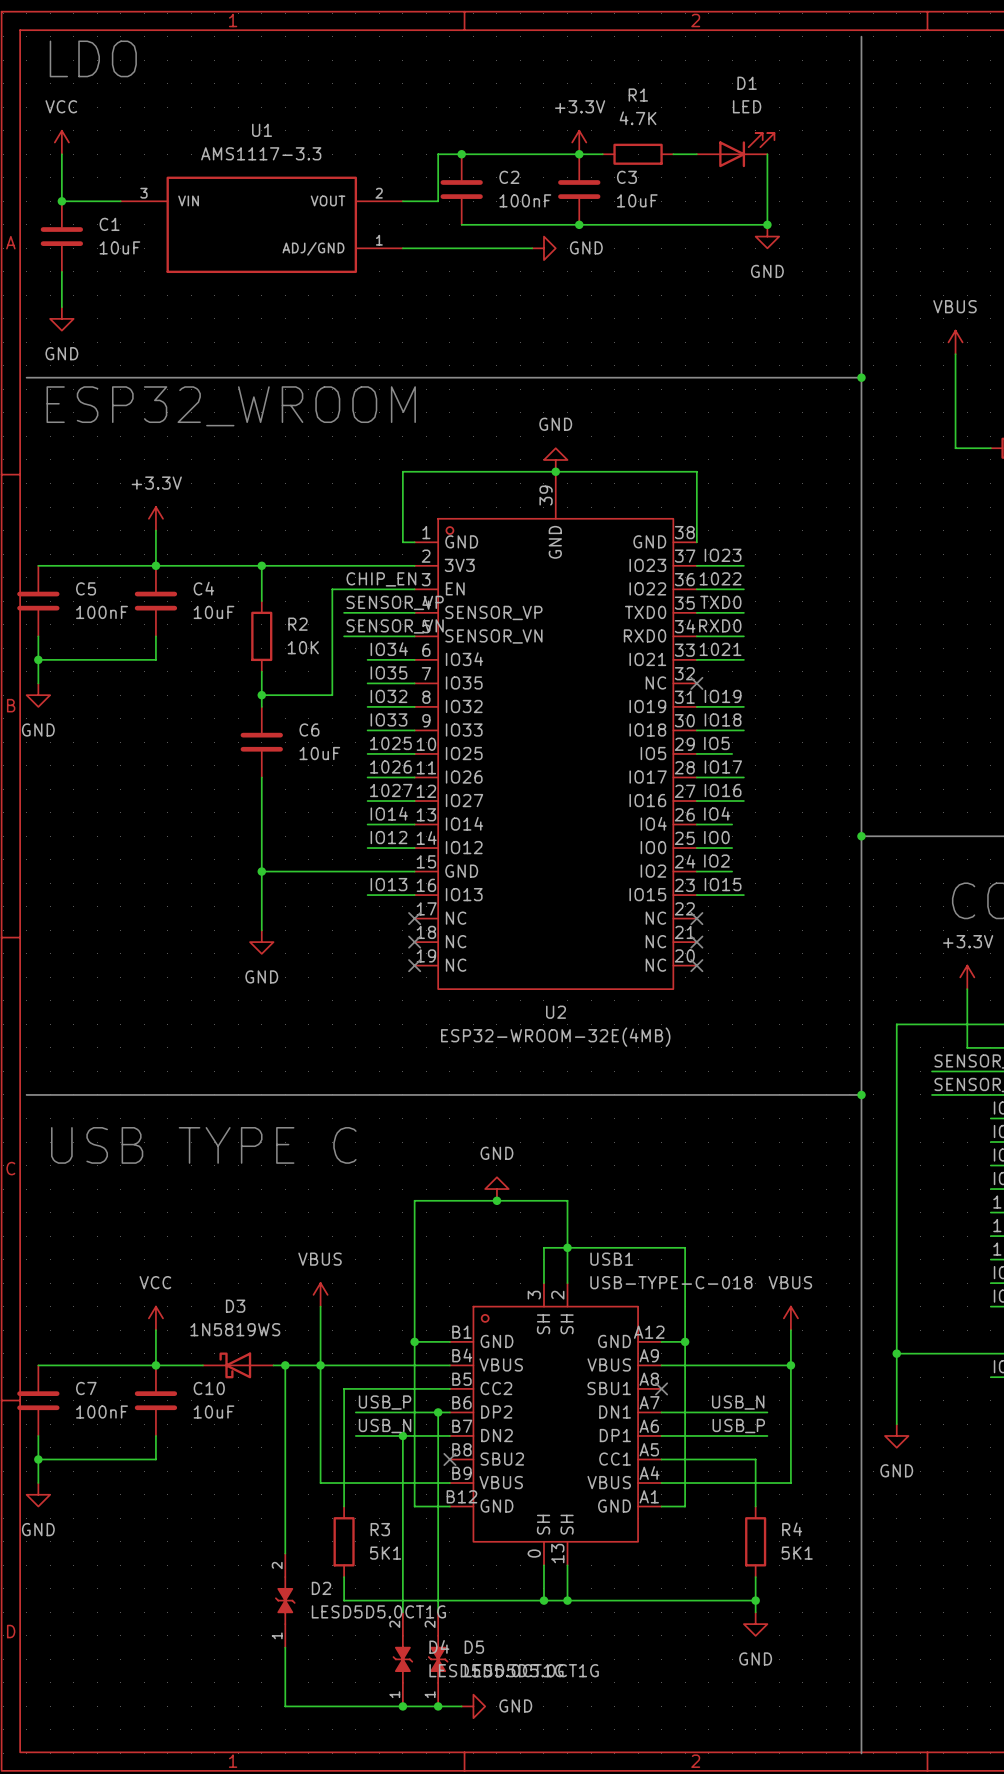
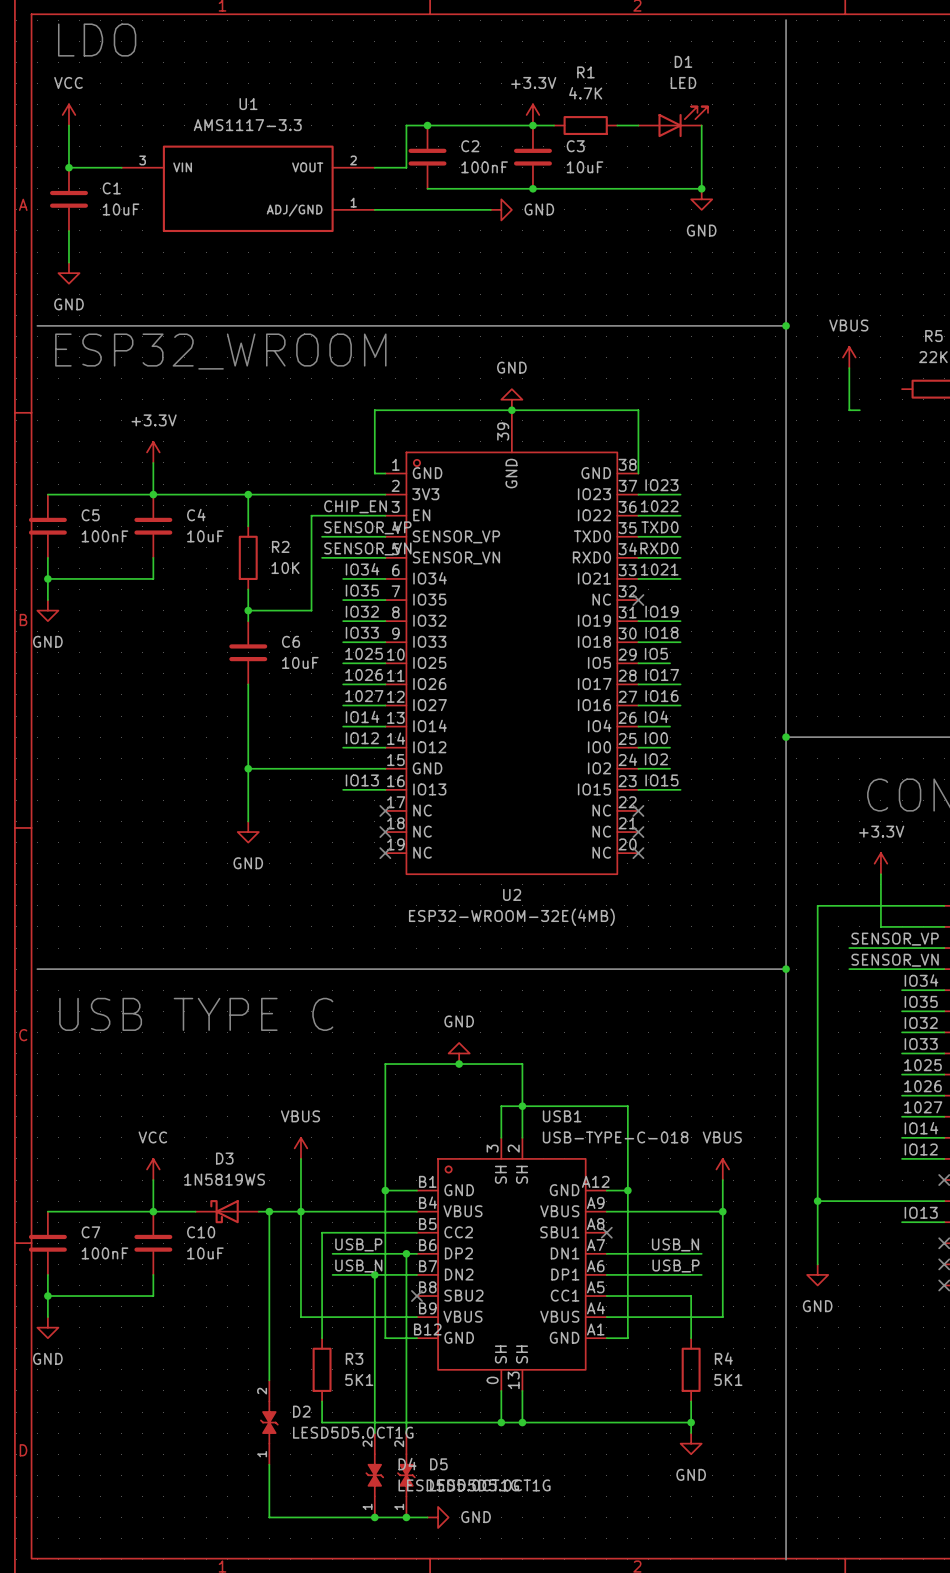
power symbol position: VBUS (955, 342) -> VBUS (849, 357)
wire: (955, 354) (955, 448) (990, 448) -> none
wire: none -> (849, 368) (849, 410) (859, 410)

